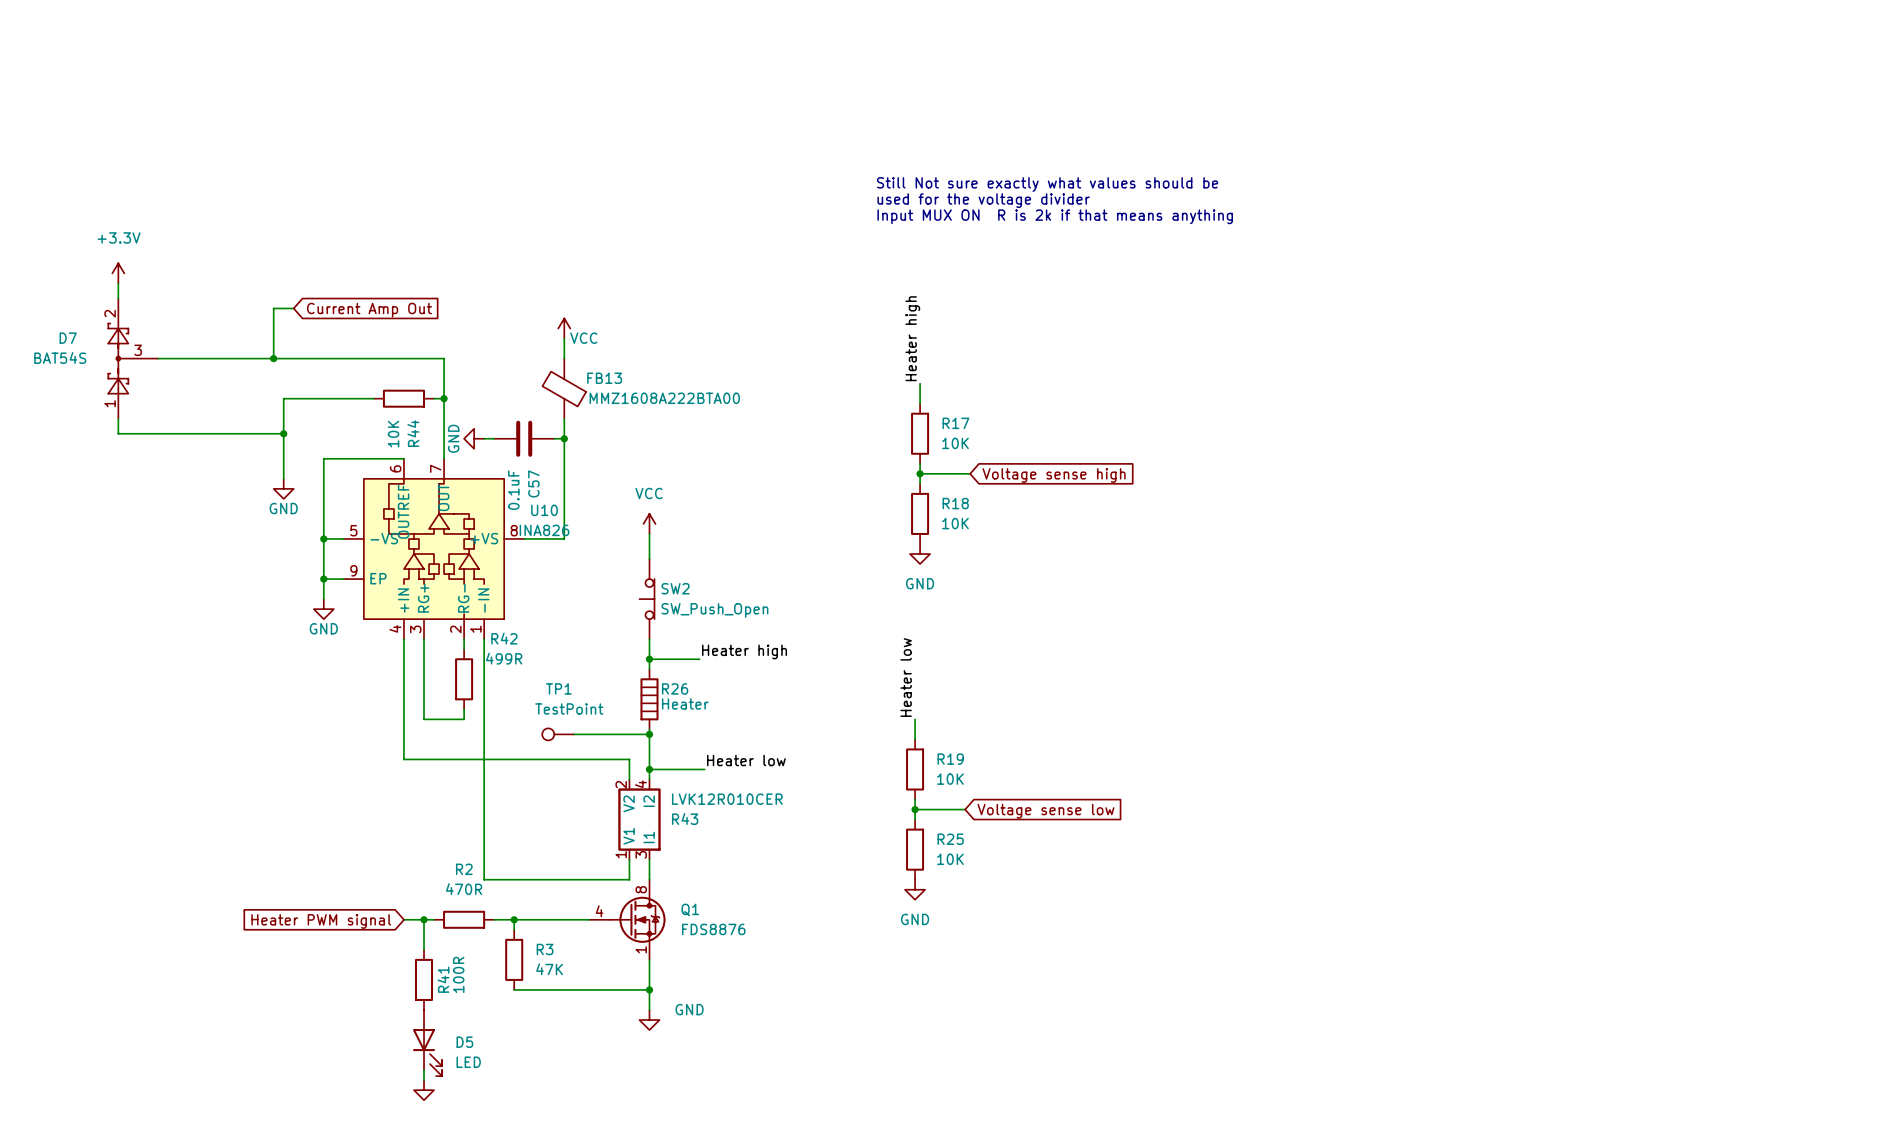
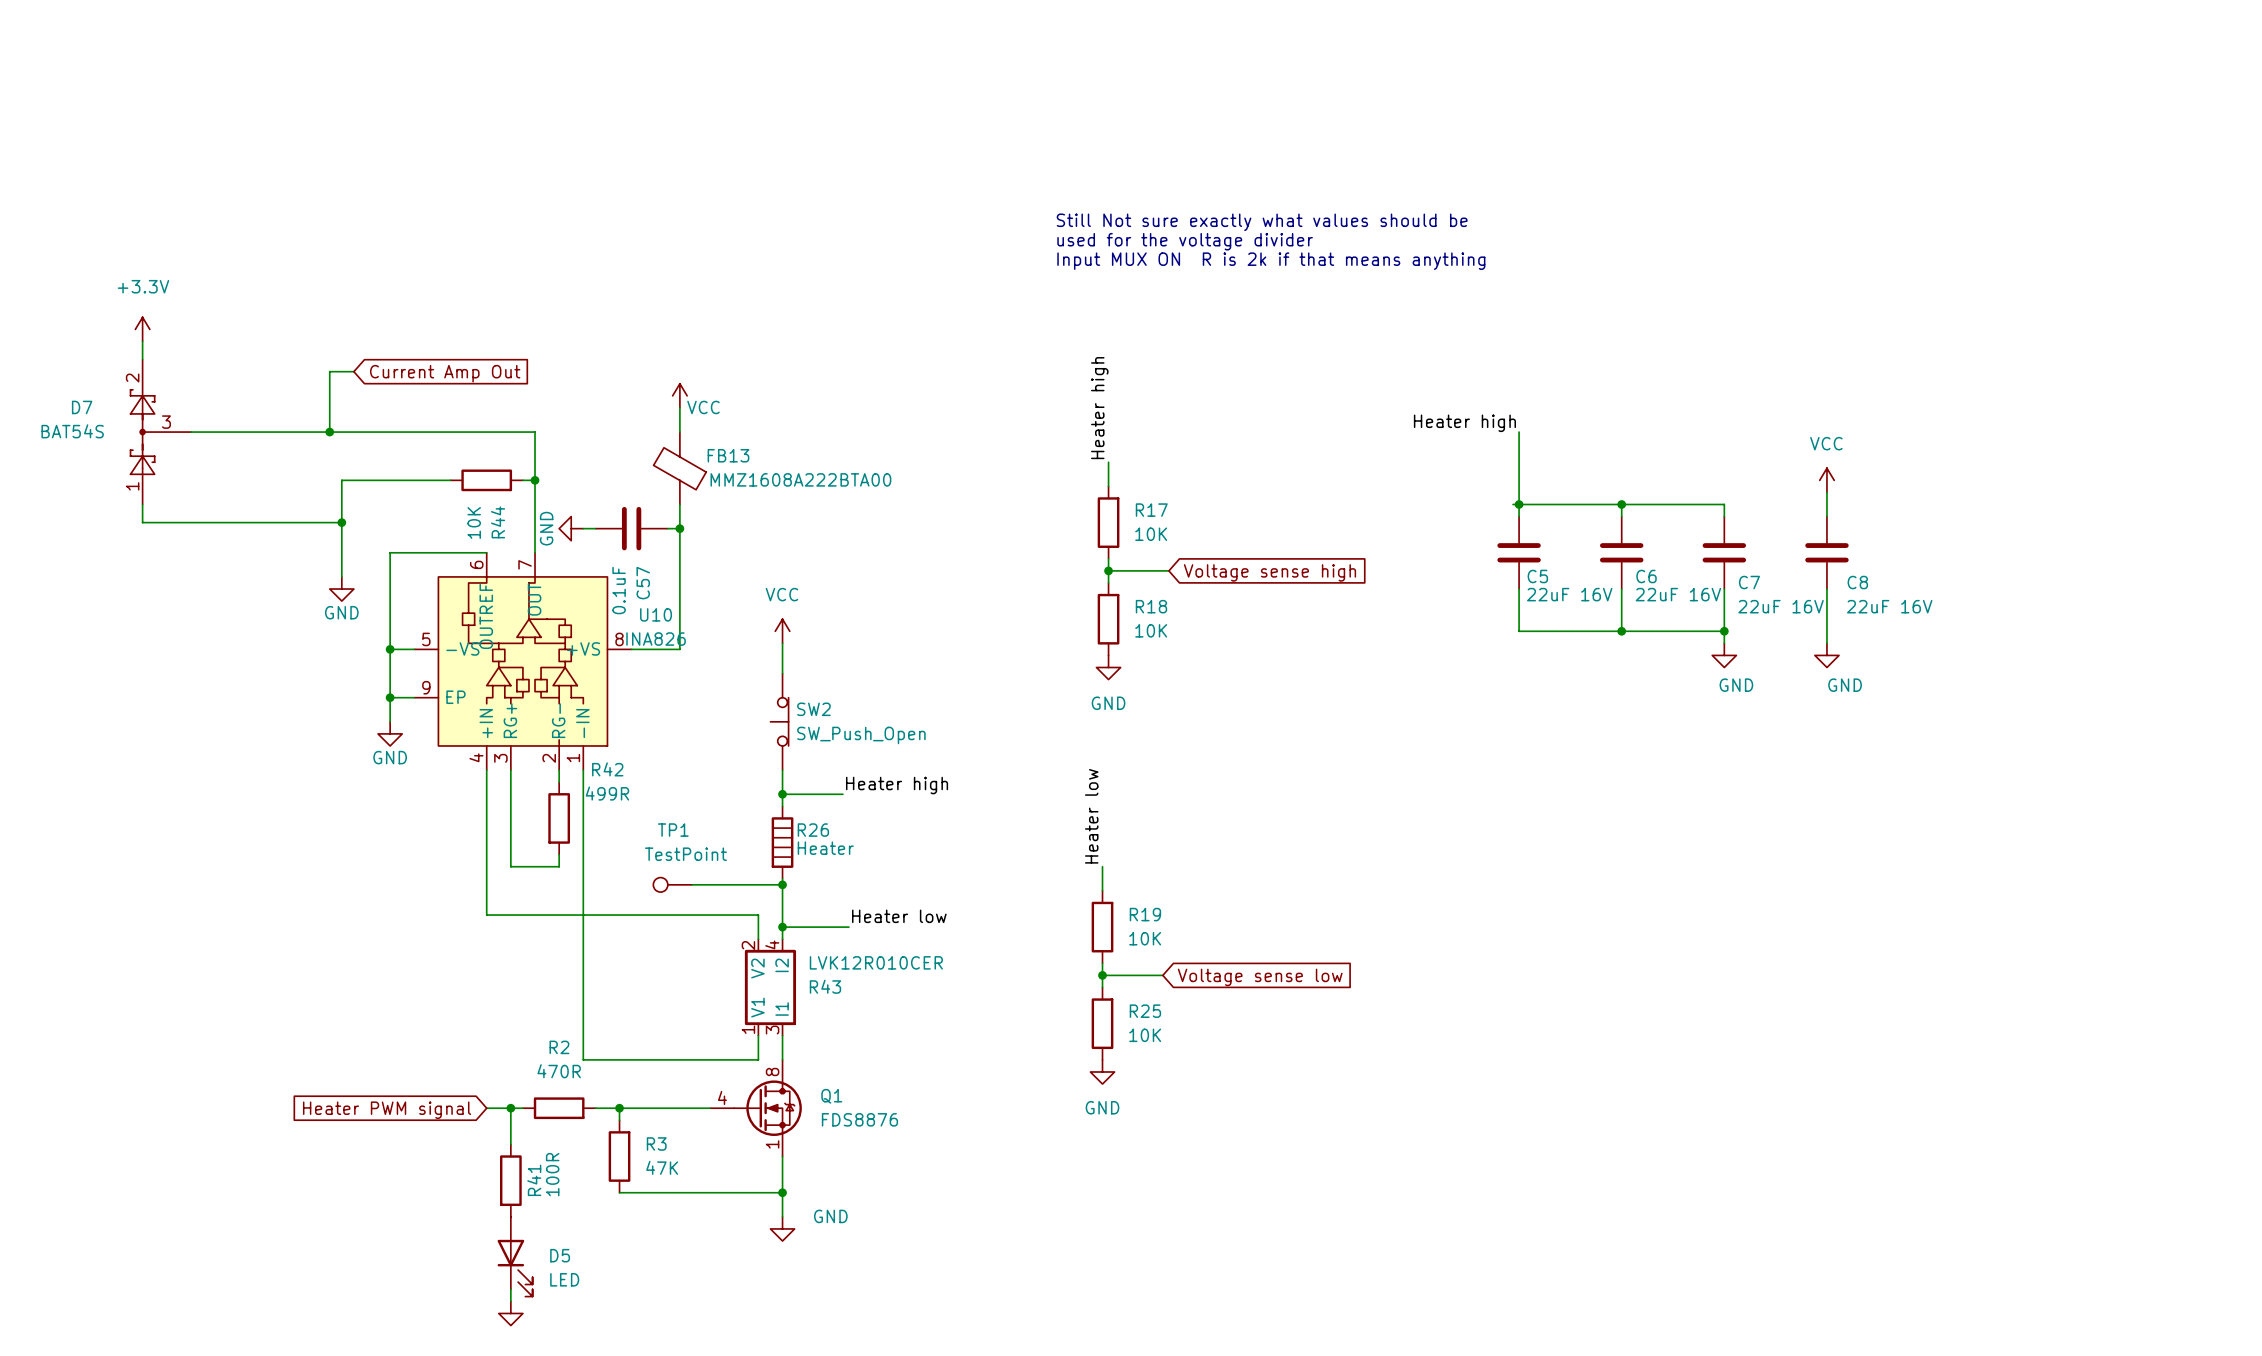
label: none -> Heater high (1464, 423)
wire: none -> (1519, 432) (1519, 516)
power symbol: none -> VCC (1826, 480)
wire: none -> (1826, 492) (1826, 516)
wire: none -> (1513, 504) (1724, 504) (1724, 516)
junction: none -> (1519, 504)
wire: none -> (1621, 504) (1621, 516)
junction: none -> (1621, 504)
C5: none -> 22uF 16V (1519, 552)
C6: none -> 22uF 16V (1621, 552)
C7: none -> 22uF 16V (1724, 552)
C8: none -> 22uF 16V (1826, 552)
wire: none -> (1519, 589) (1519, 631) (1724, 631)
wire: none -> (1621, 589) (1621, 631)
wire: none -> (1724, 589) (1724, 643)
wire: none -> (1826, 589) (1826, 643)
junction: none -> (1621, 631)
junction: none -> (1724, 631)
power symbol: none -> GND (1724, 655)
power symbol: none -> GND (1826, 655)

